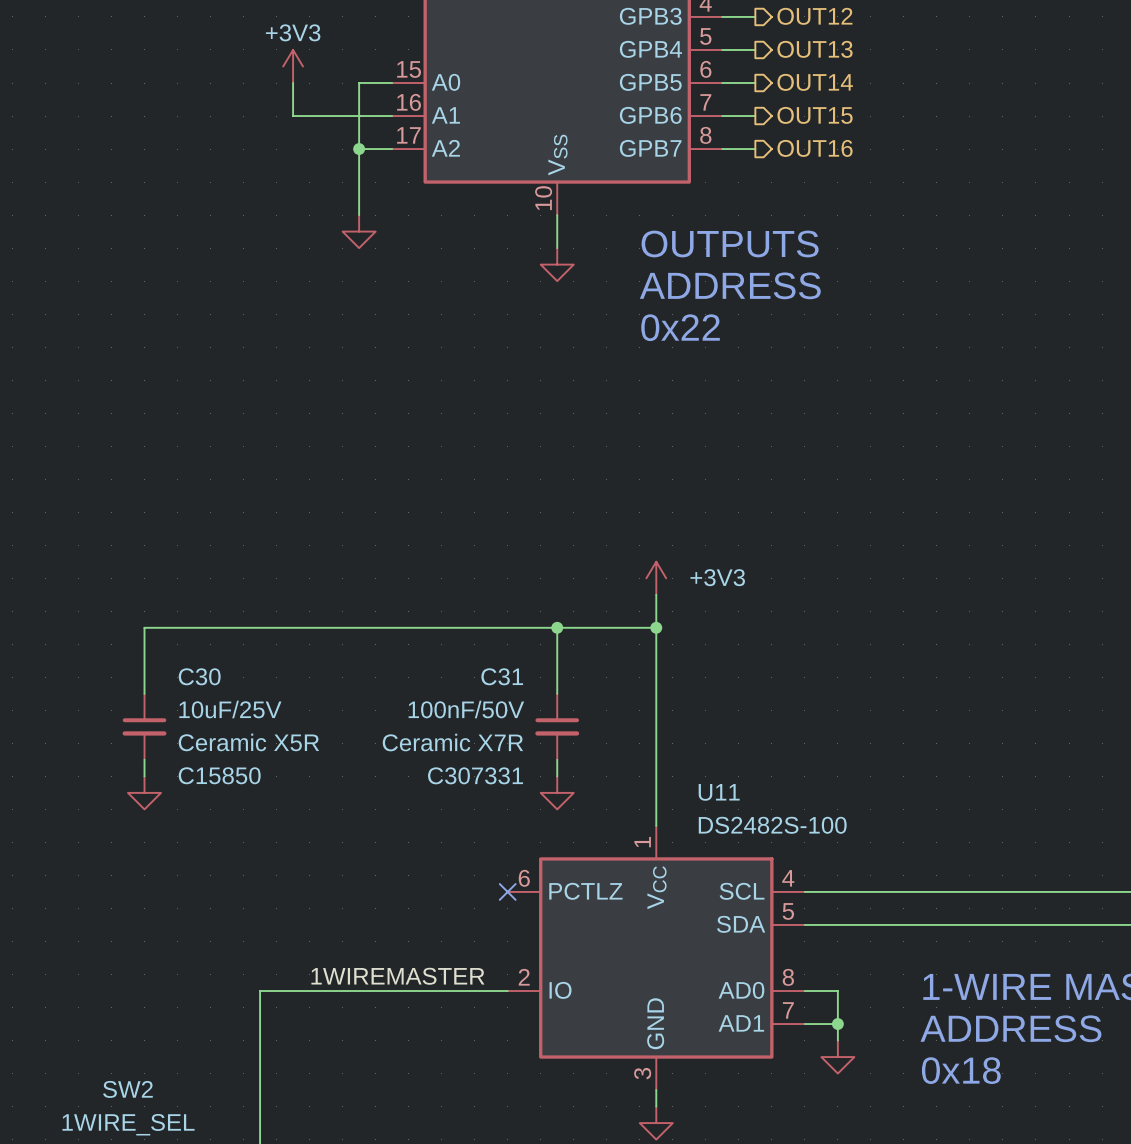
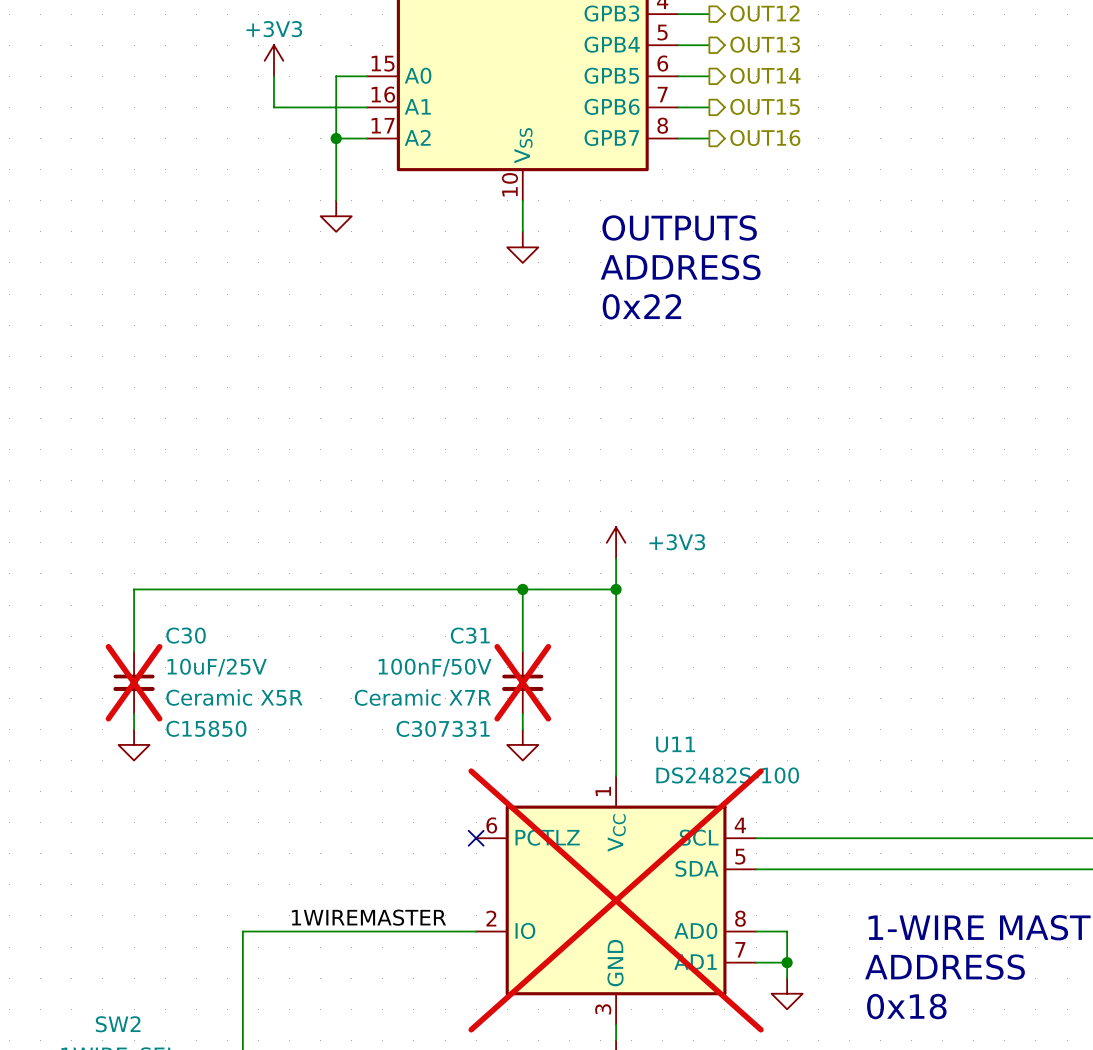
C30 do-not-place cross: none -> (134, 682)
C31 do-not-place cross: none -> (522, 682)
U11 do-not-place cross: none -> (616, 900)

